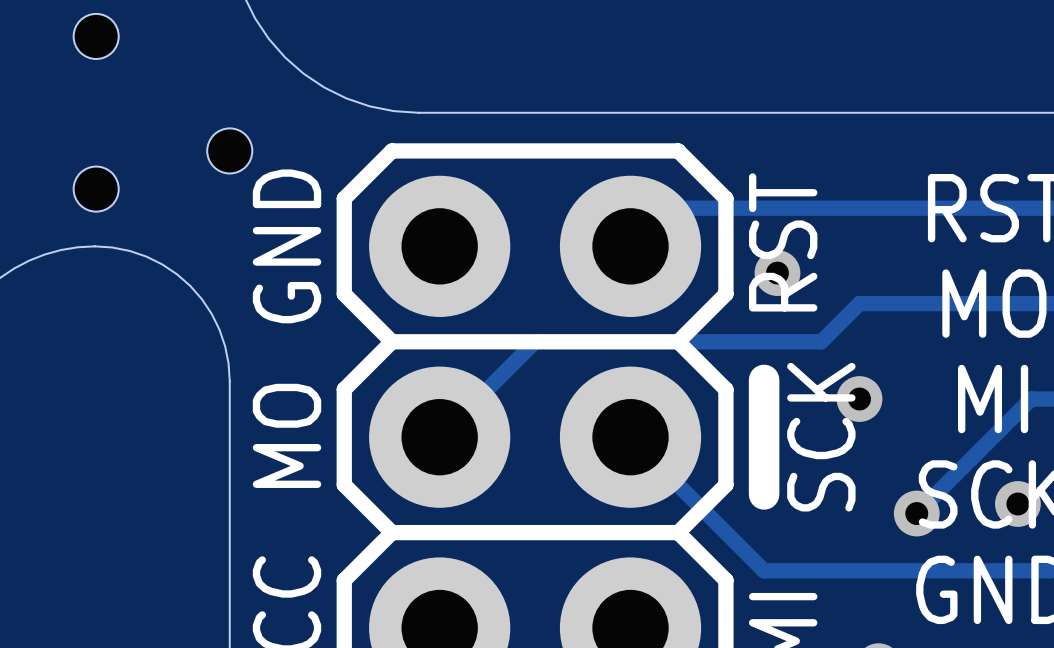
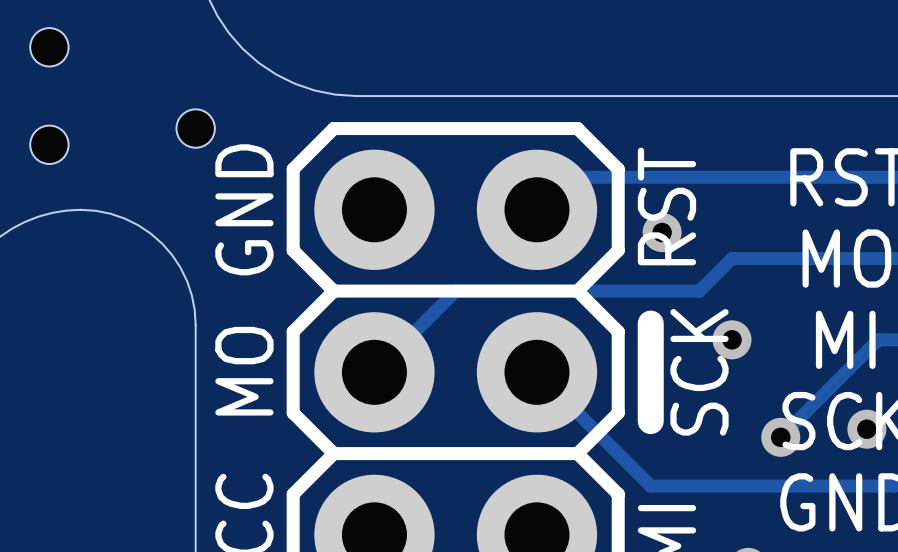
hole position: (96, 36) -> (49, 47)
hole position: (96, 189) -> (49, 144)

